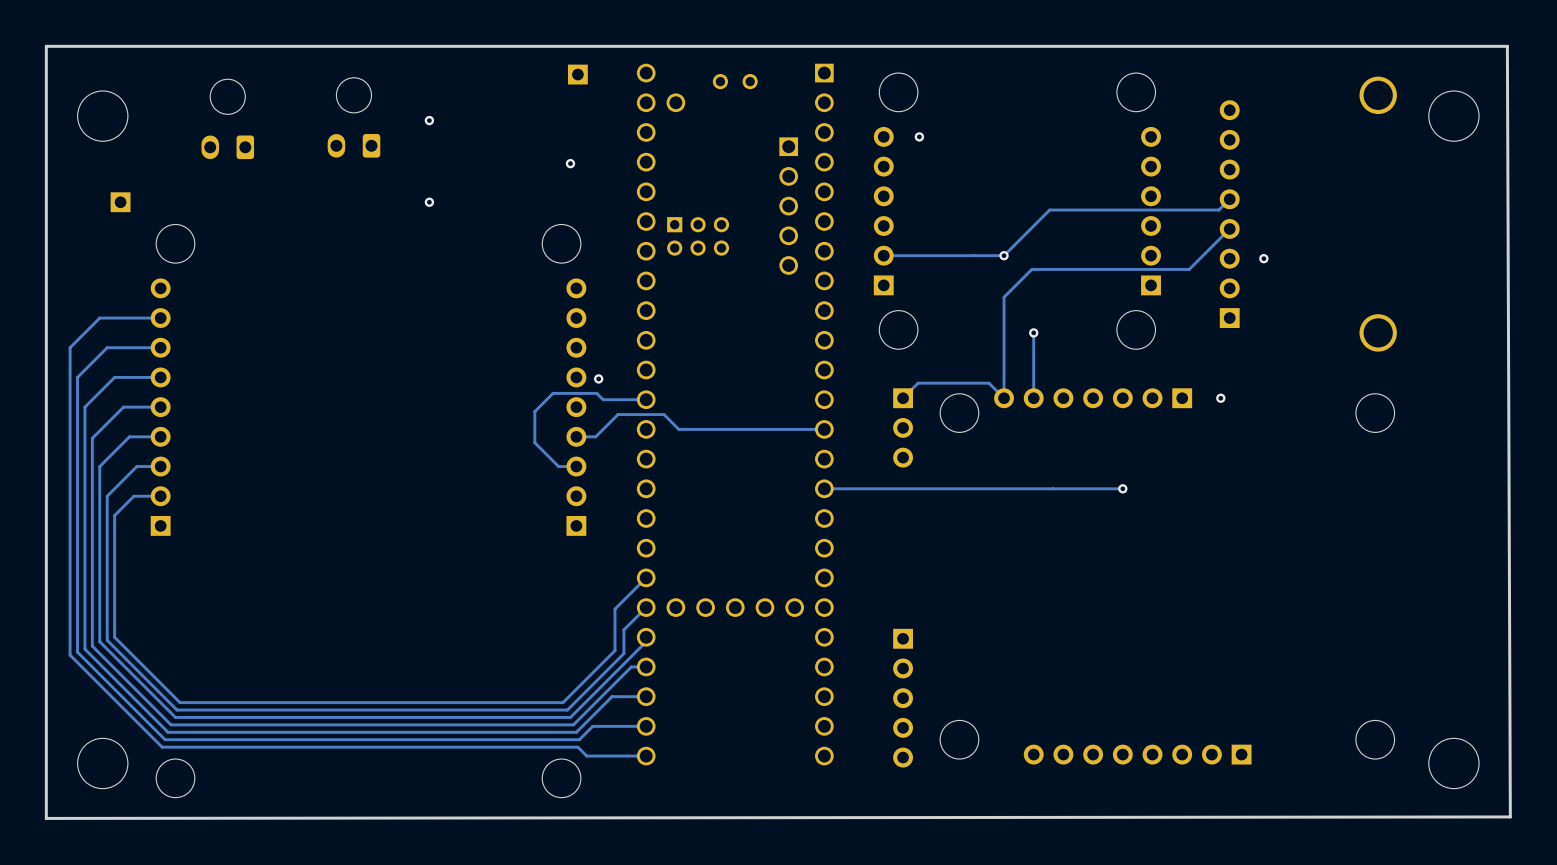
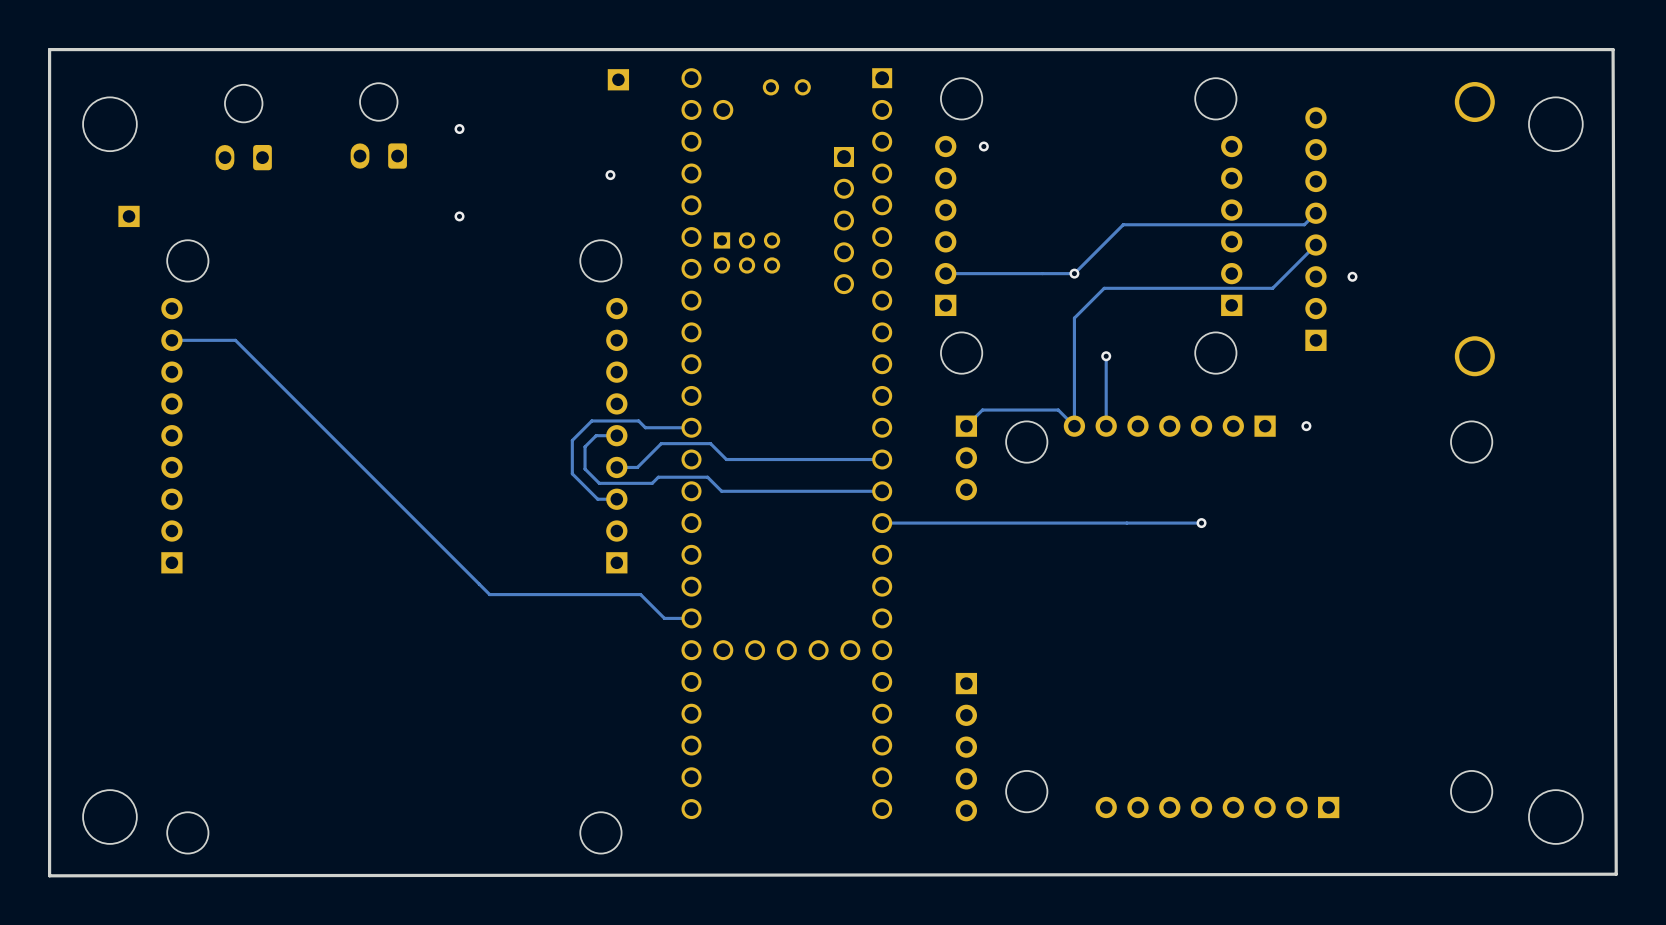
track: (160, 318) (99, 318) (70, 347) (70, 655) (162, 747) (577, 747) (586, 756) (646, 756) -> (171, 340) (235, 340) (489, 594) (640, 594) (664, 618) (691, 618)
track: (160, 347) (107, 347) (77, 377) (77, 652) (165, 739) (579, 739) (592, 726) (646, 726) -> none
track: (160, 377) (114, 377) (84, 407) (84, 649) (168, 732) (576, 732) (612, 696) (646, 696) -> none
via: (598, 378) -> none
track: (160, 407) (123, 407) (92, 438) (92, 646) (171, 724) (573, 724) (631, 666) (646, 666) -> none
track: none -> (616, 435) (596, 435) (585, 446) (585, 469) (599, 483) (652, 483) (658, 477) (707, 477) (721, 491) (882, 491)
track: (160, 436) (129, 436) (99, 466) (99, 641) (175, 717) (570, 717) (646, 641) (646, 637) -> none
track: (160, 466) (136, 466) (107, 496) (107, 640) (176, 710) (567, 710) (623, 653) (623, 629) (646, 607) -> none
track: (160, 496) (133, 496) (114, 515) (114, 637) (179, 702) (563, 702) (615, 650) (615, 609) (646, 577) -> none

